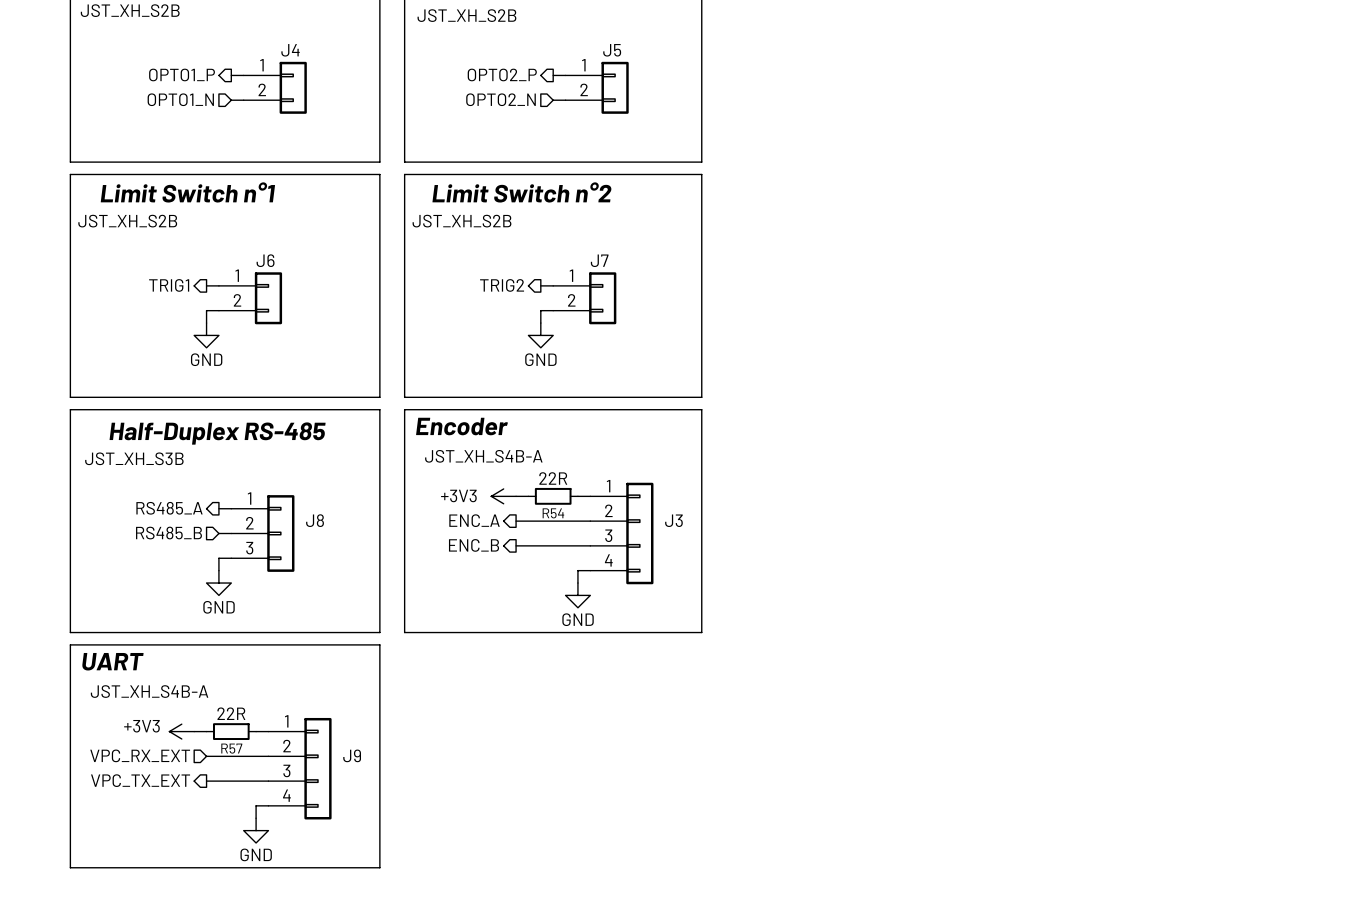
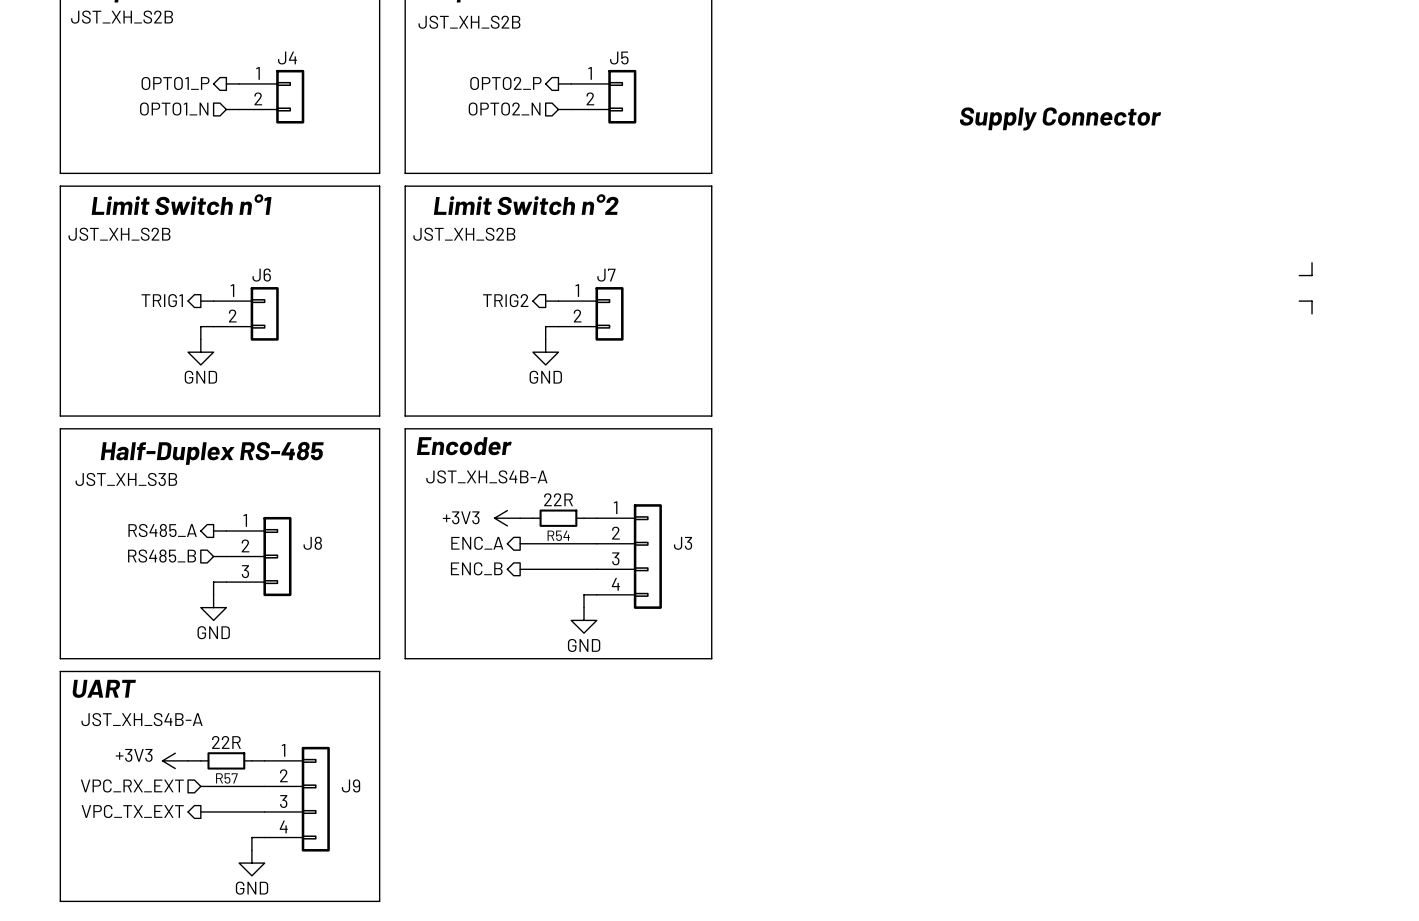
text: none -> Supply Connector (1060, 118)
wire: none -> (1312, 262) (1312, 275) (1299, 275)
wire: none -> (1299, 301) (1312, 301) (1312, 313)

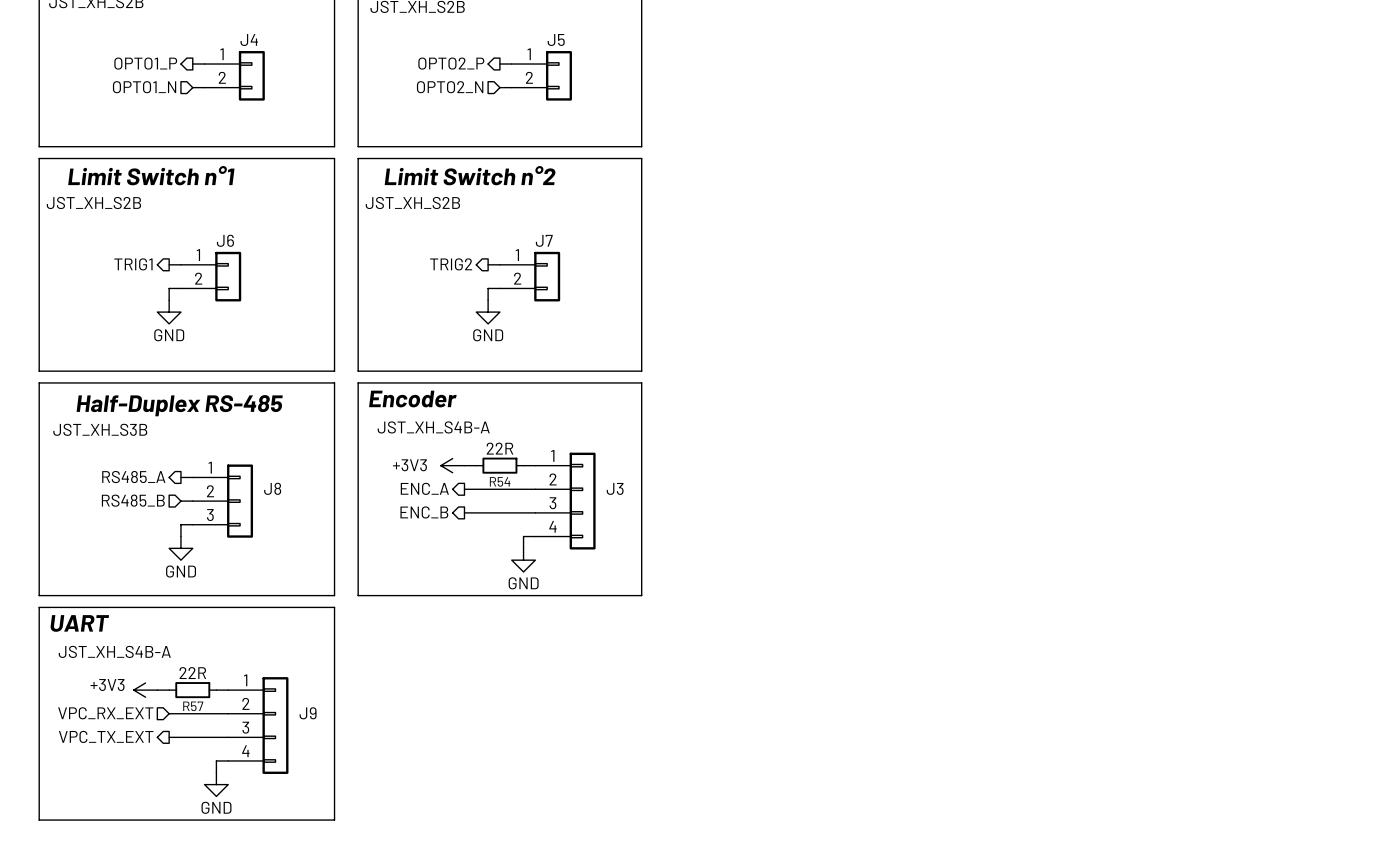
text: Supply Connector (1060, 118) -> none
wire: (1312, 262) (1312, 275) (1299, 275) -> none
wire: (1299, 301) (1312, 301) (1312, 313) -> none

